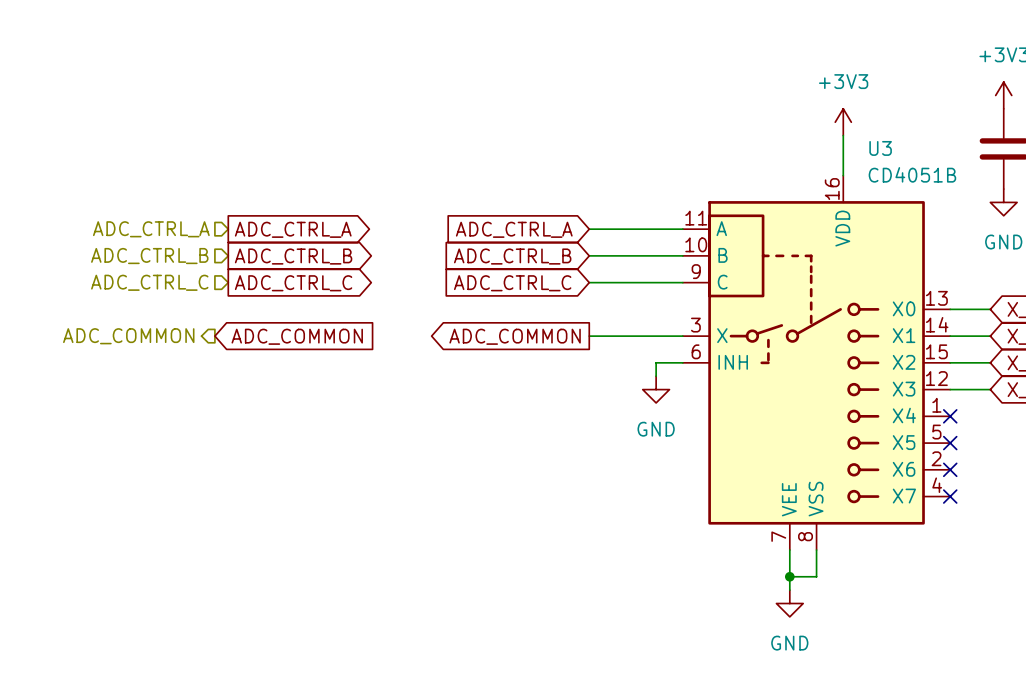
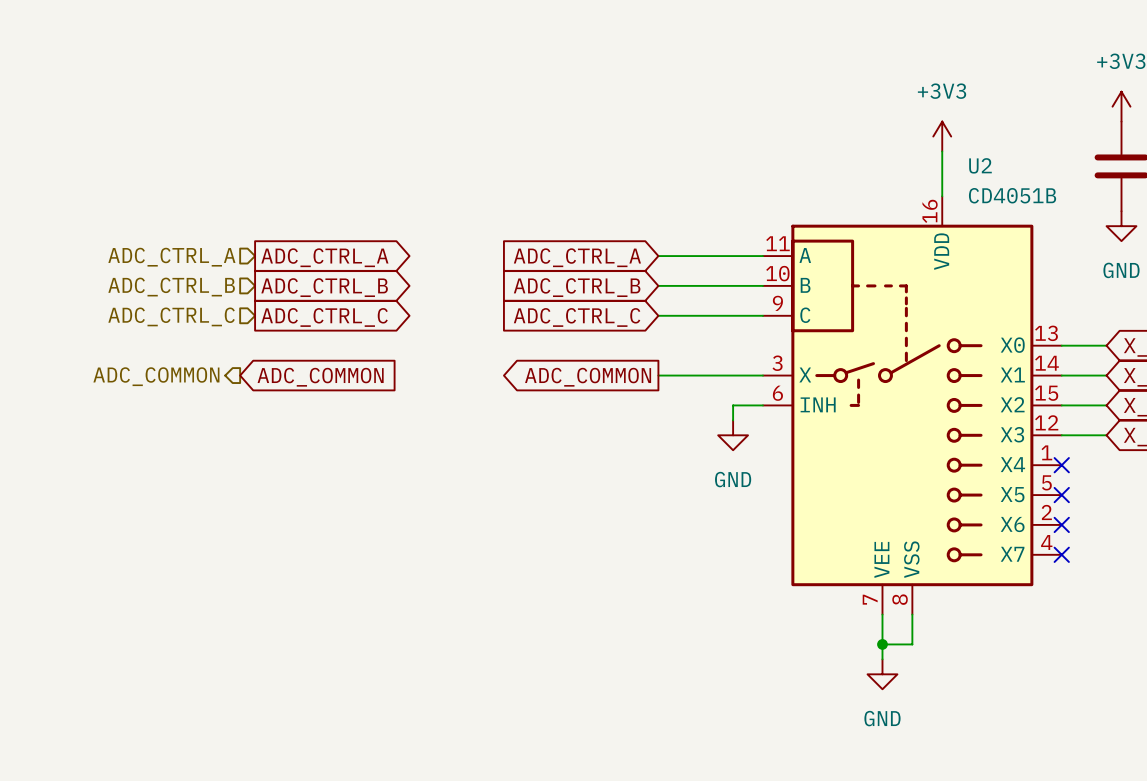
U3 name: U3 (880, 148) -> U2 (980, 165)

